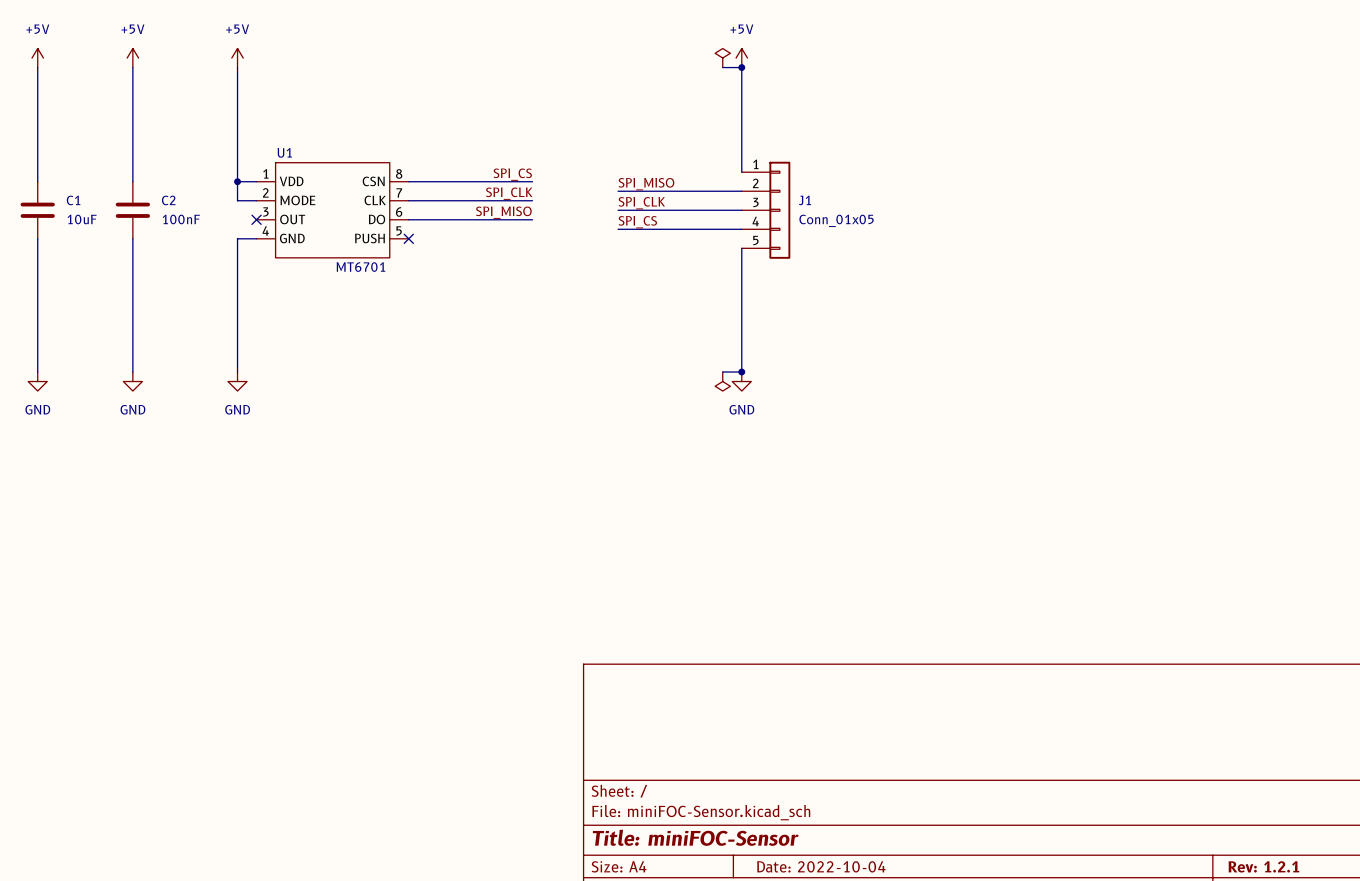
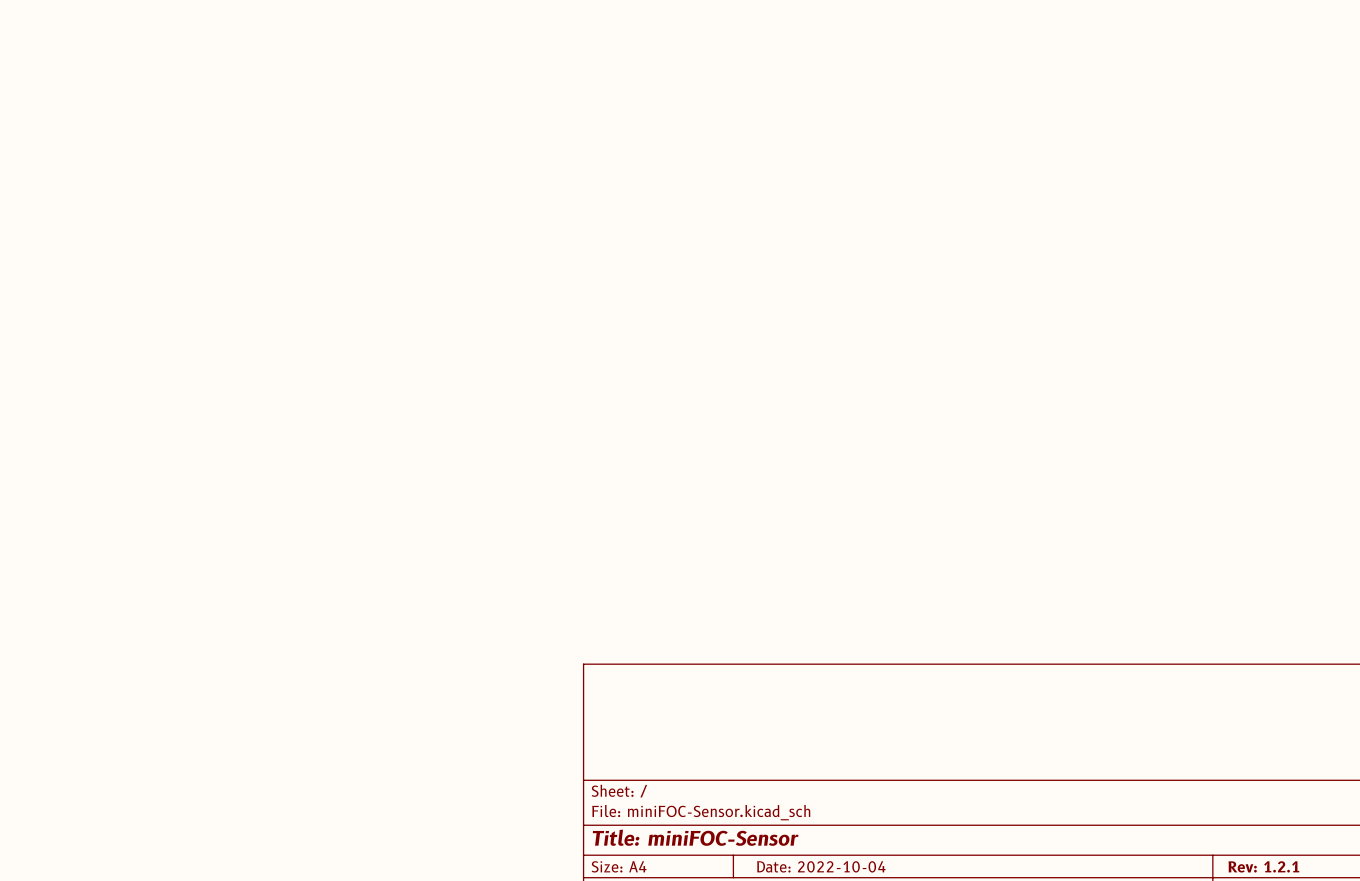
power symbol: +5V (37, 58) -> none
power symbol: +5V (132, 58) -> none
power symbol: +5V (237, 58) -> none
power symbol: (722, 58) -> none
power symbol: +5V (741, 58) -> none
wire: (37, 67) (37, 181) -> none
wire: (132, 67) (132, 181) -> none
wire: (237, 67) (237, 200) (256, 200) -> none
wire: (722, 67) (741, 67) (741, 172) -> none
junction: (741, 67) -> none
label: SPI_CS (512, 174) -> none
wire: (237, 181) (256, 181) -> none
junction: (237, 181) -> none
wire: (408, 181) (532, 181) -> none
label: SPI_MISO (646, 184) -> none
wire: (618, 191) (741, 191) -> none
label: SPI_CLK (509, 193) -> none
wire: (408, 200) (532, 200) -> none
label: SPI_CLK (641, 203) -> none
C1: 10uF (37, 210) -> none
C2: 100nF (132, 210) -> none
U1: MT6701 (332, 210) -> none
wire: (618, 210) (741, 210) -> none
J1: Conn_01x05 (766, 210) -> none
label: SPI_MISO (503, 212) -> none
no-connect mark: (256, 219) -> none
wire: (408, 219) (532, 219) -> none
label: SPI_CS (637, 222) -> none
wire: (618, 229) (741, 229) -> none
wire: (37, 238) (37, 372) -> none
wire: (132, 238) (132, 372) -> none
wire: (256, 238) (237, 238) (237, 372) -> none
no-connect mark: (408, 238) -> none
wire: (741, 248) (741, 372) (722, 372) -> none
junction: (741, 372) -> none
power symbol: GND (37, 381) -> none
power symbol: GND (132, 381) -> none
power symbol: GND (237, 381) -> none
power symbol: (722, 381) -> none
power symbol: GND (741, 381) -> none

